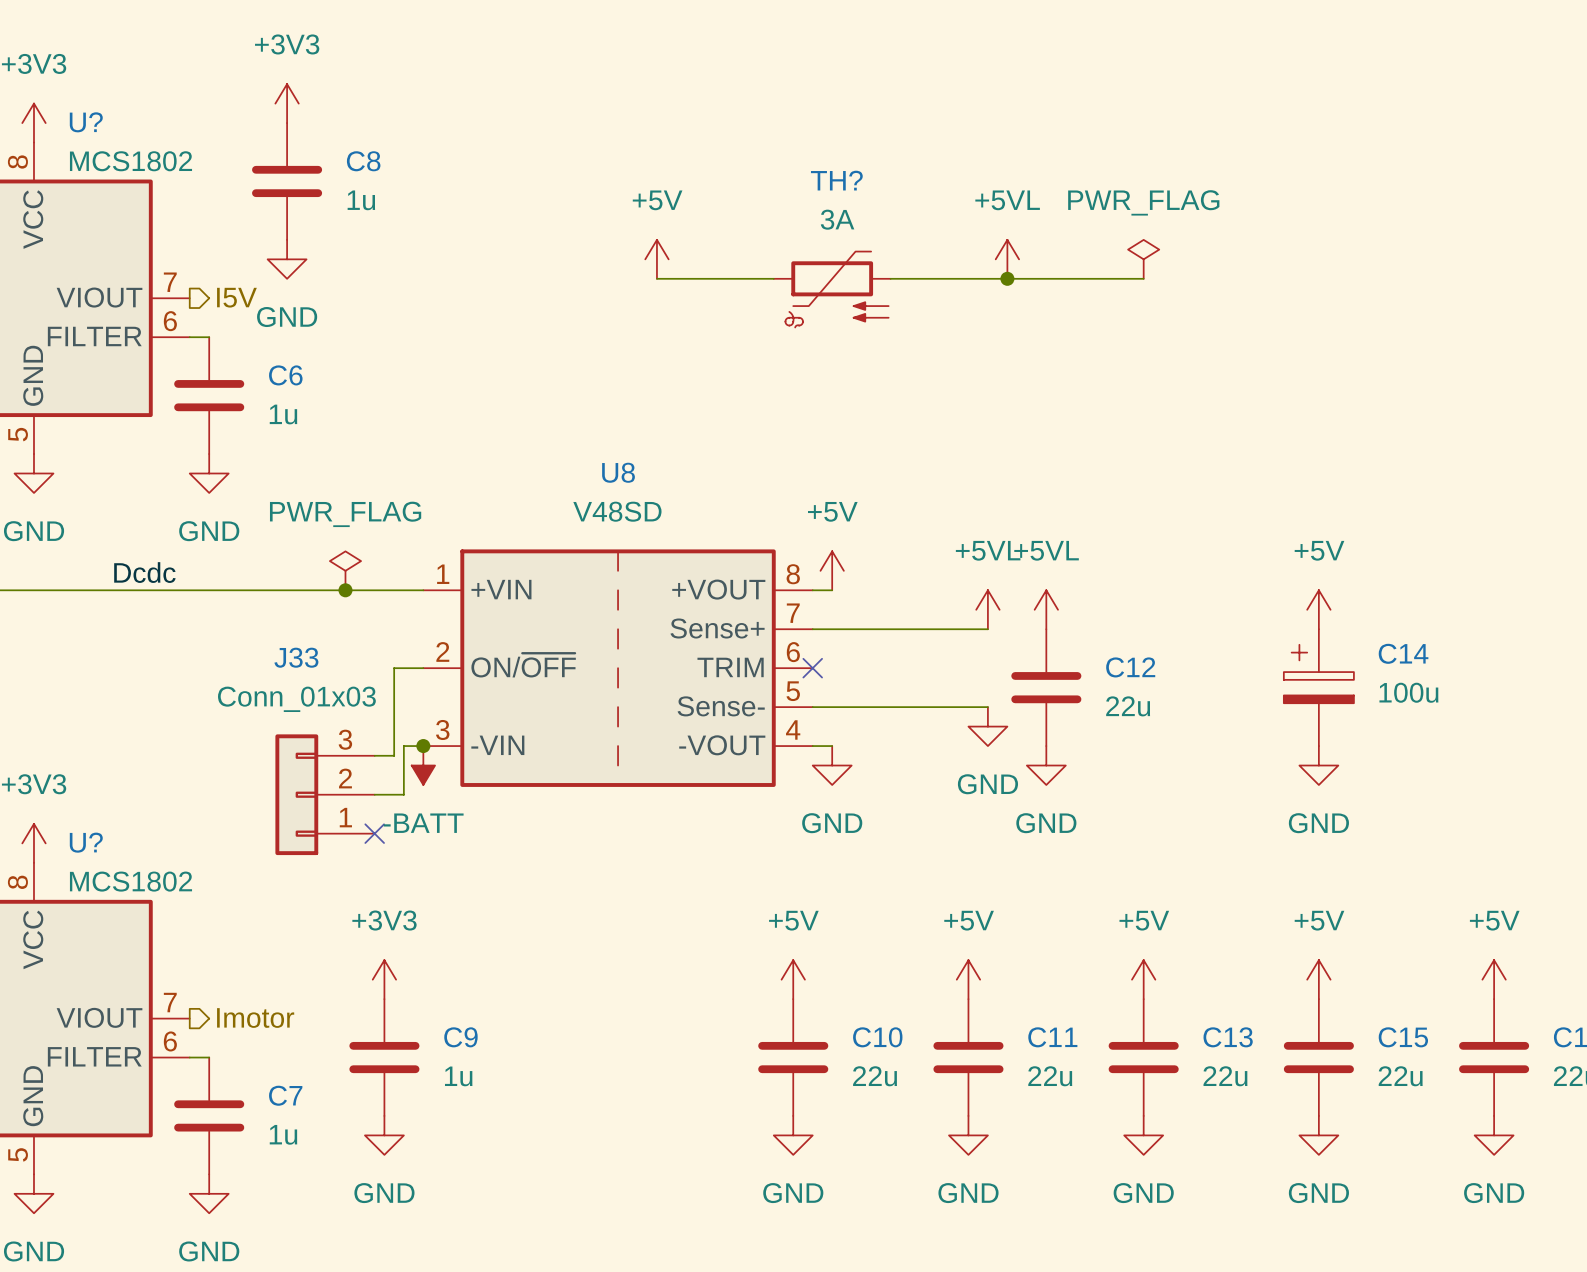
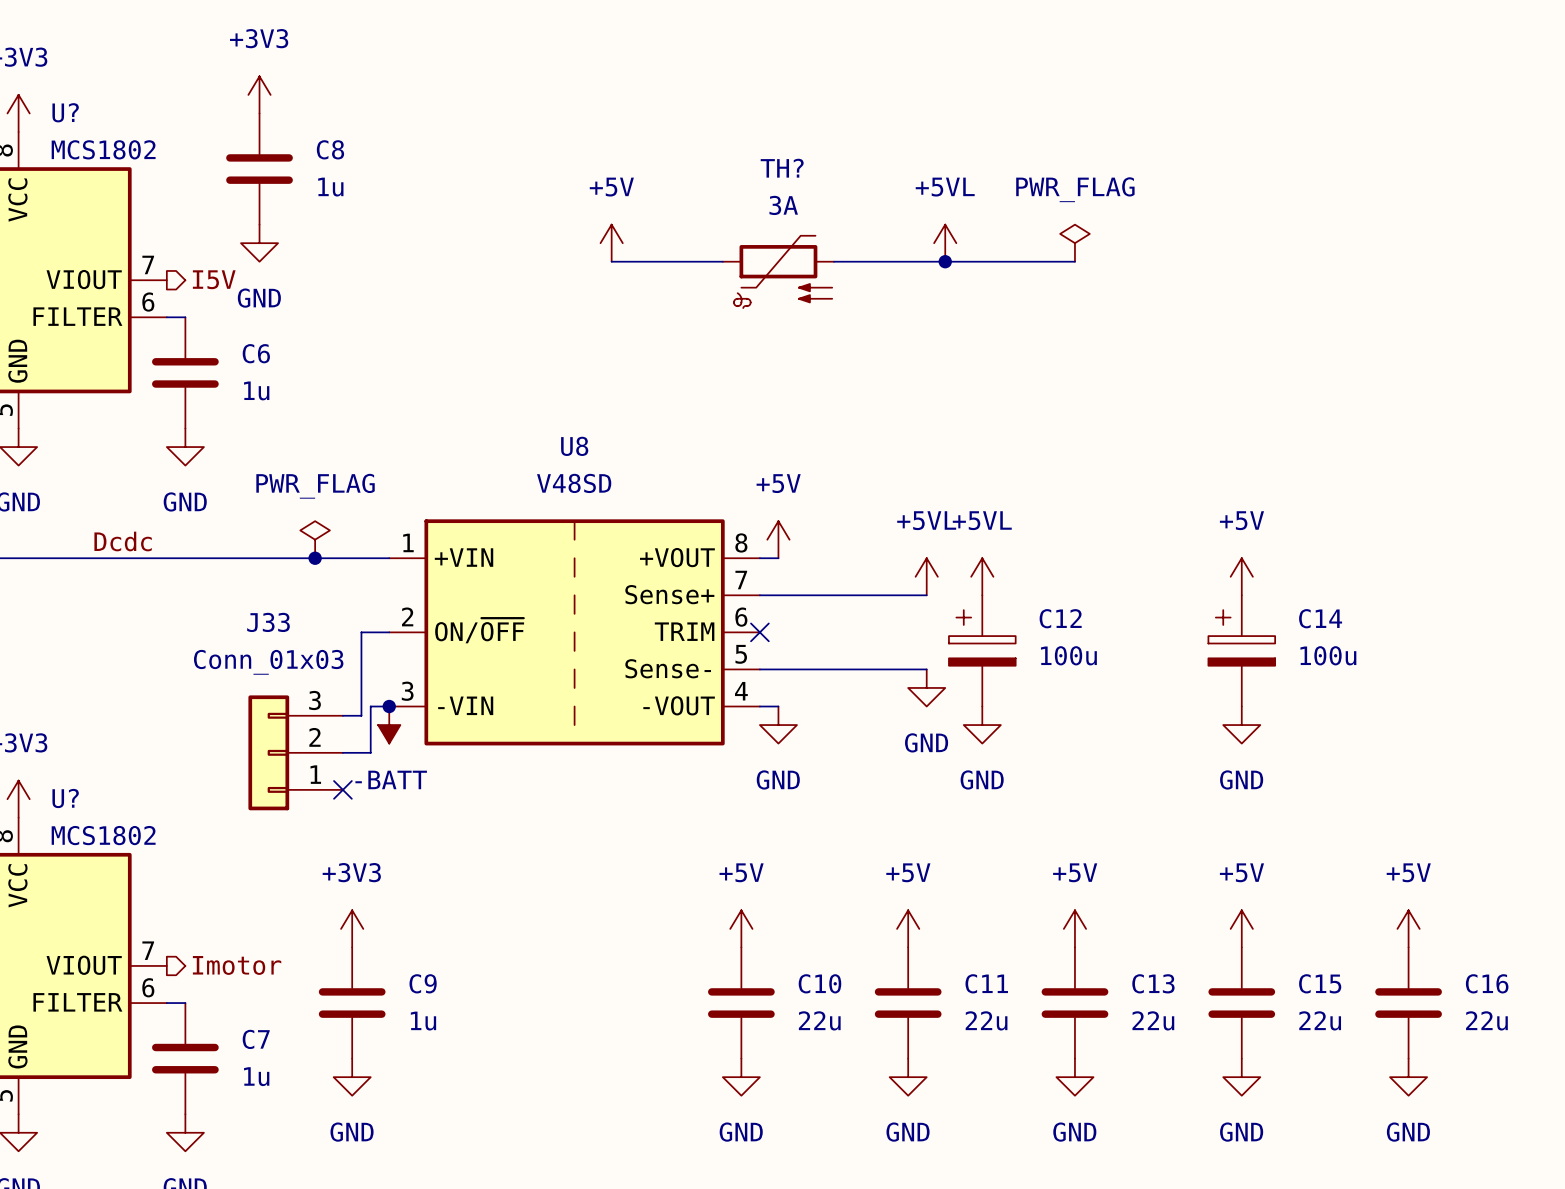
C12 symbol: [1011, 629, 1082, 747] -> [948, 595, 1016, 707]
C12 value: 22u (1128, 706) -> 100u (1068, 655)

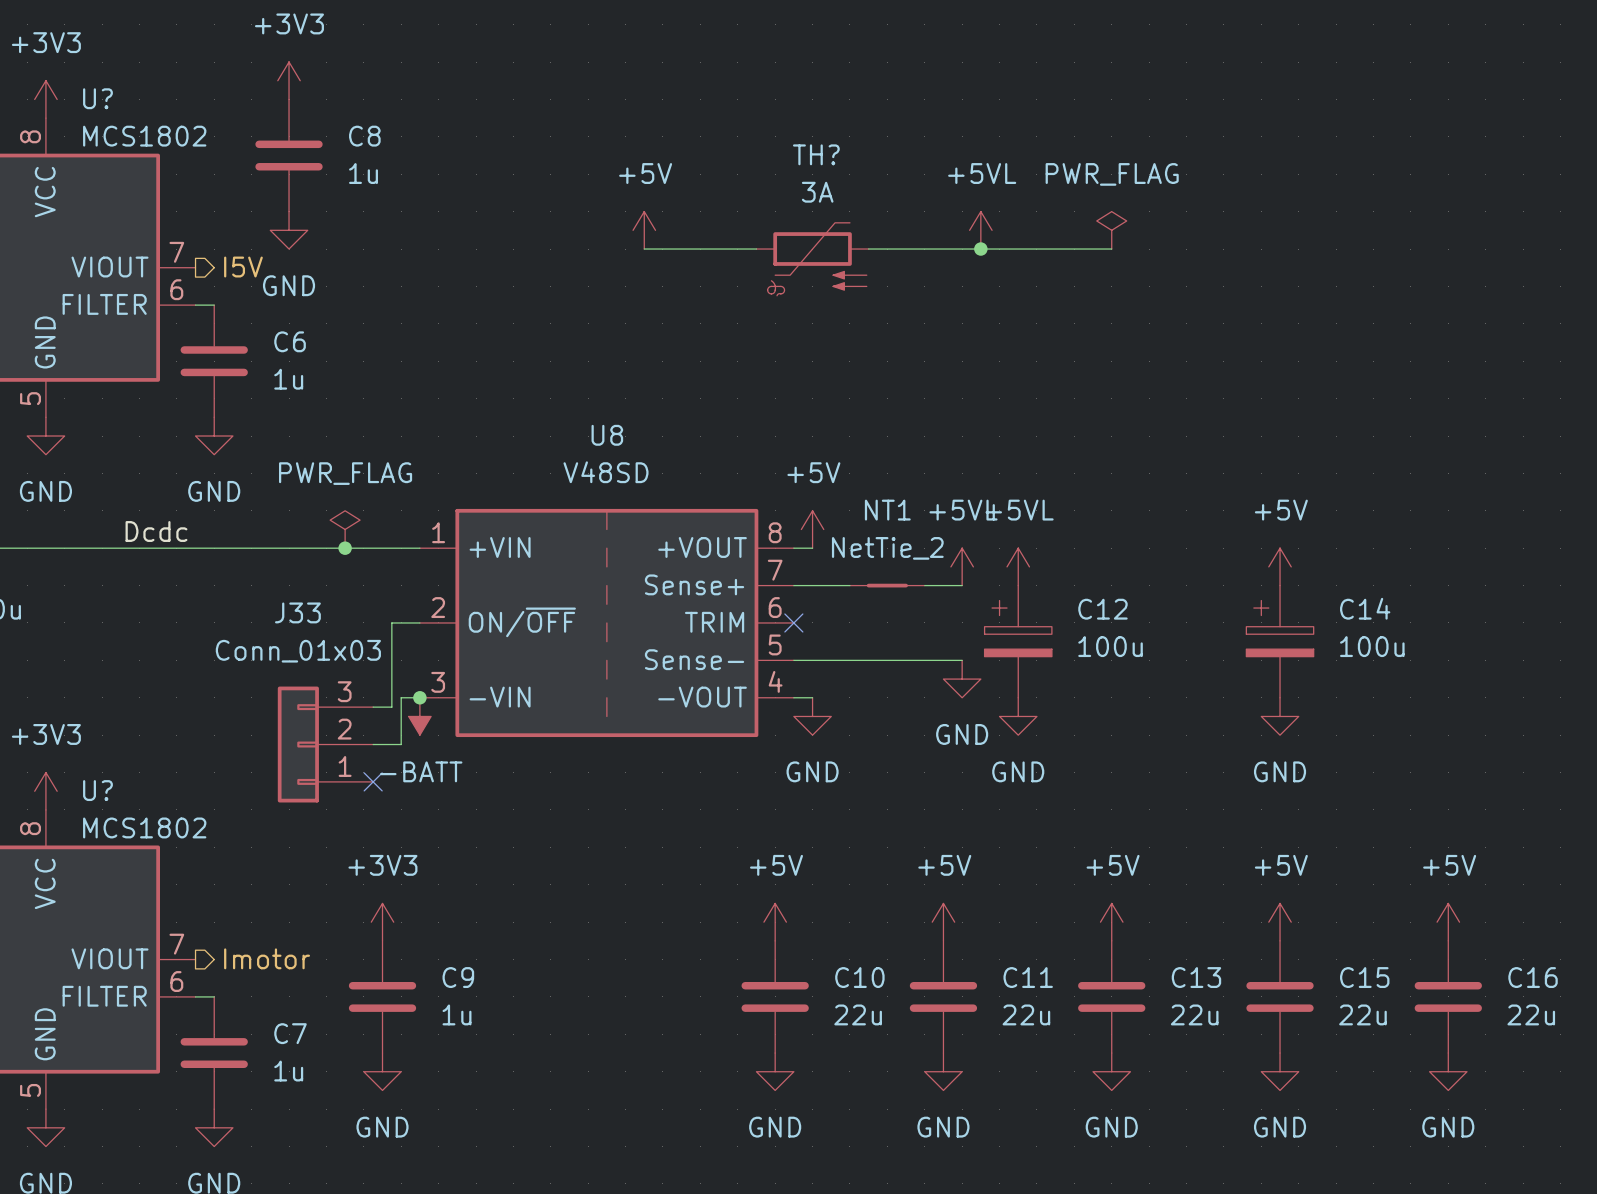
NT1: none -> NetTie_2 (887, 585)

